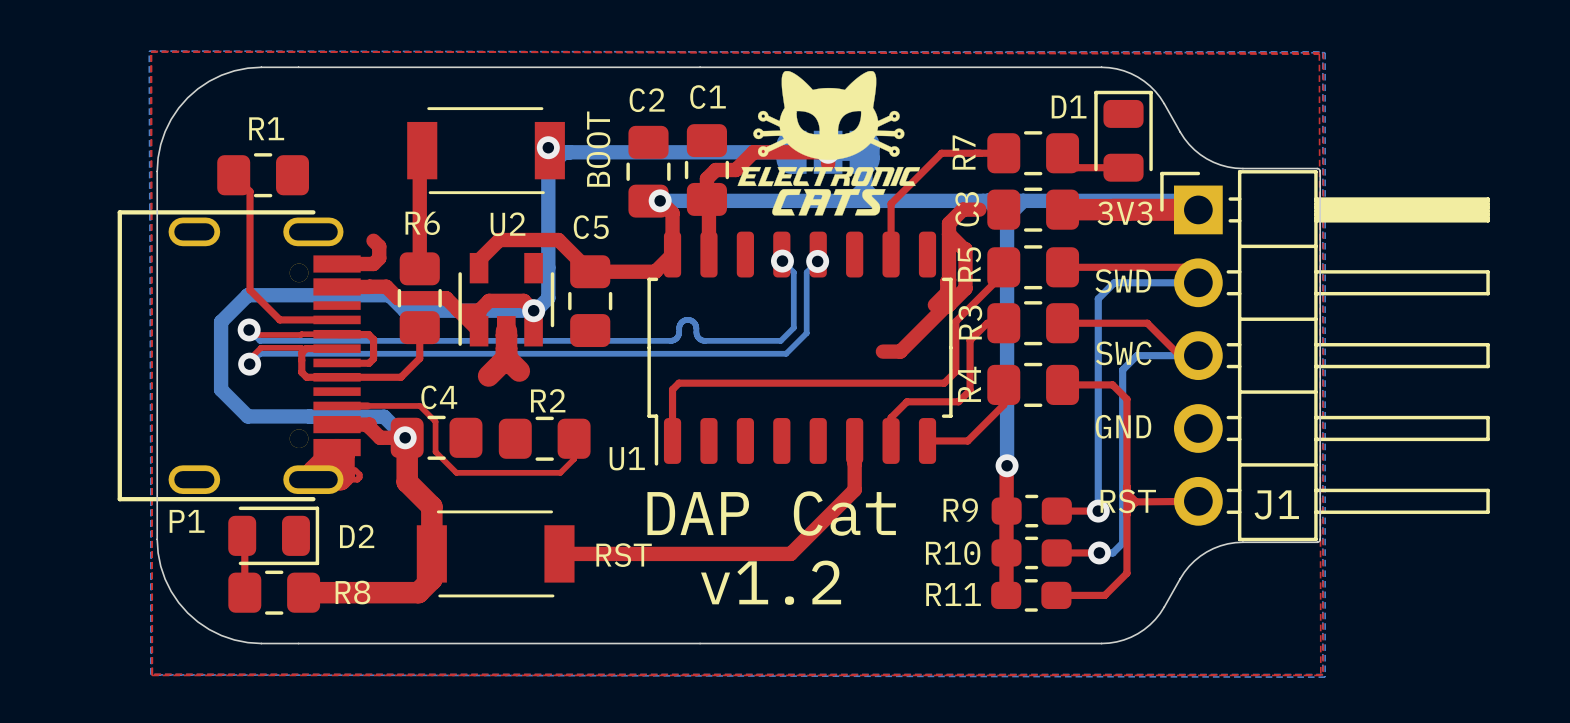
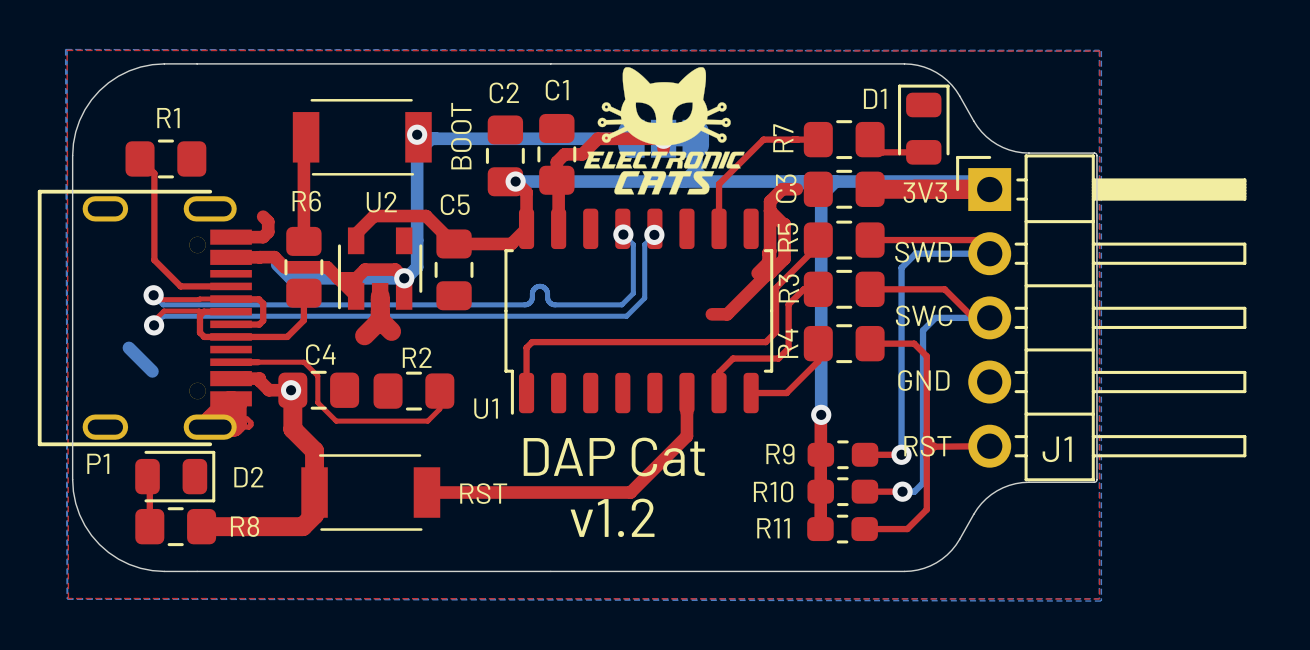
top zone outline: (151, 51) (152, 675) (1320, 675) (1319, 54) (151, 51) -> none
bottom track: (389, 295) (247, 295) (221, 321) (221, 389) -> none
bottom track: (247, 416) (309, 416) -> none
bottom track: (310, 416) (384, 416) (405, 437) -> none

